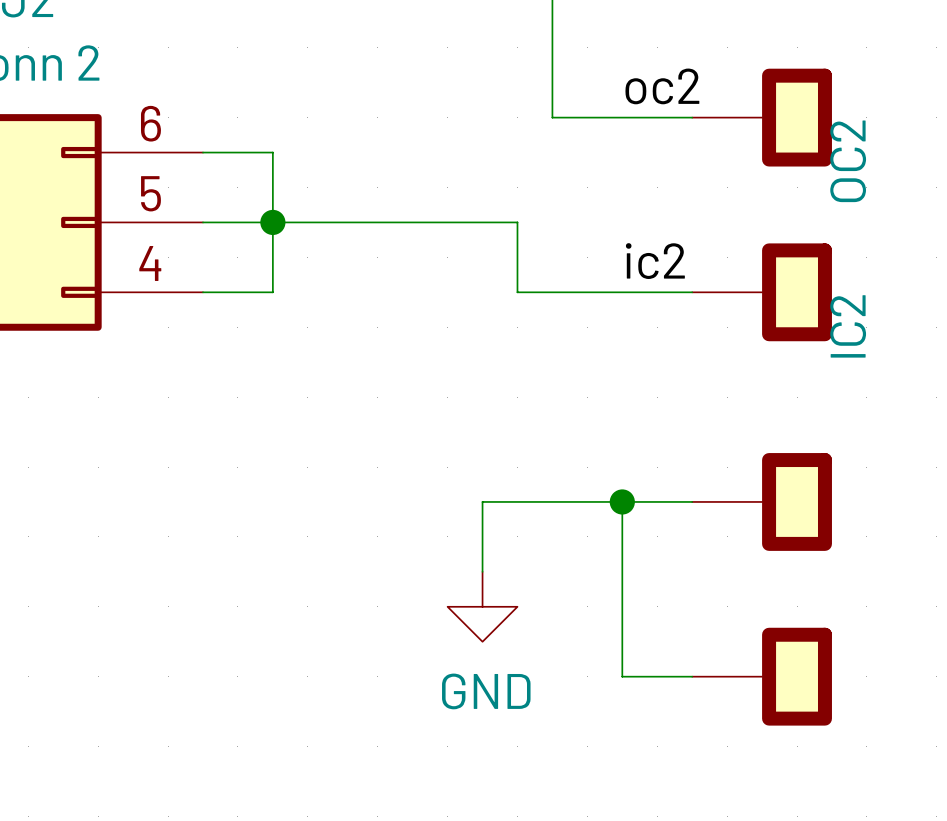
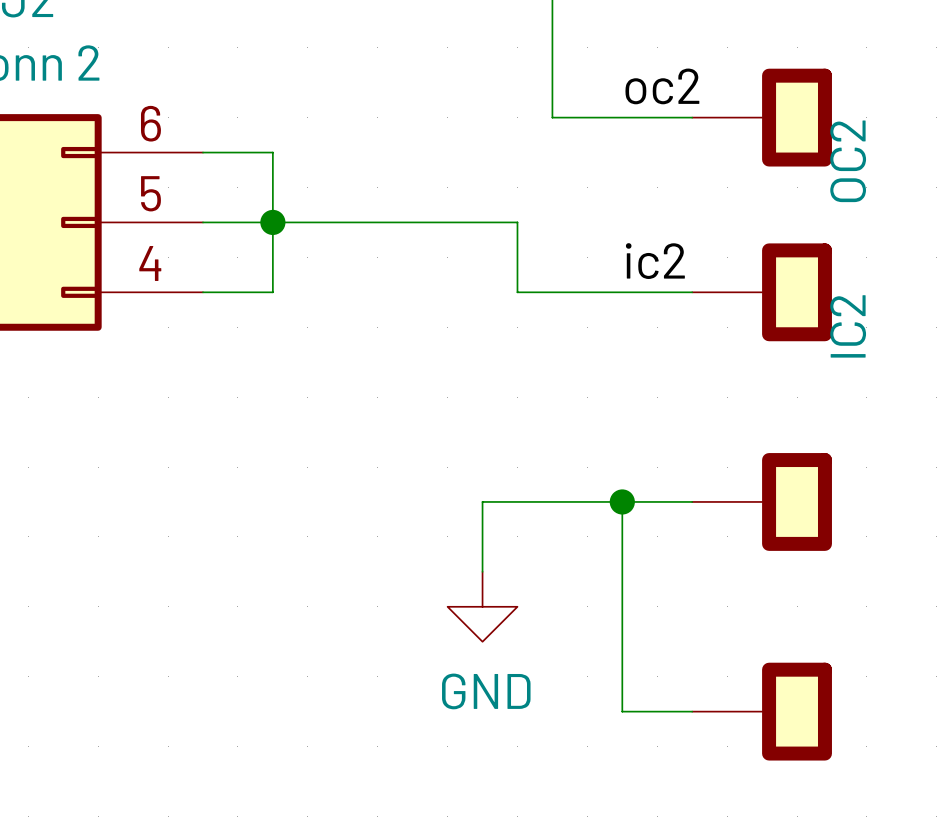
wire: (622, 676) (692, 676) -> (622, 676) (622, 711) (692, 711)
part position: (762, 676) -> (762, 711)

